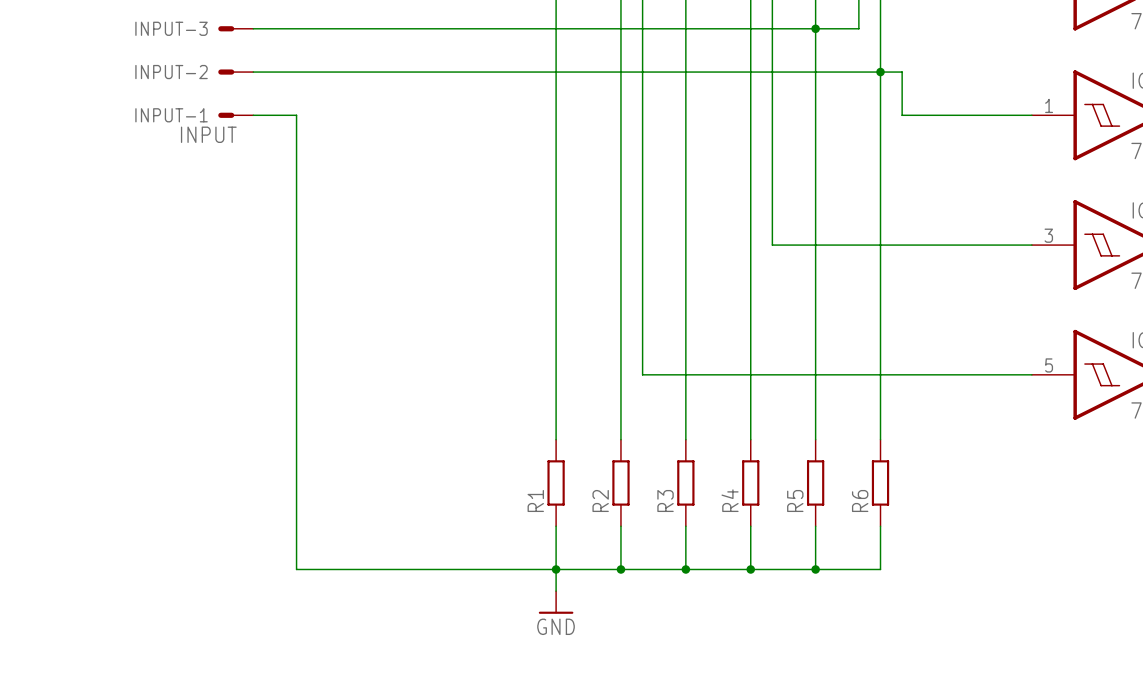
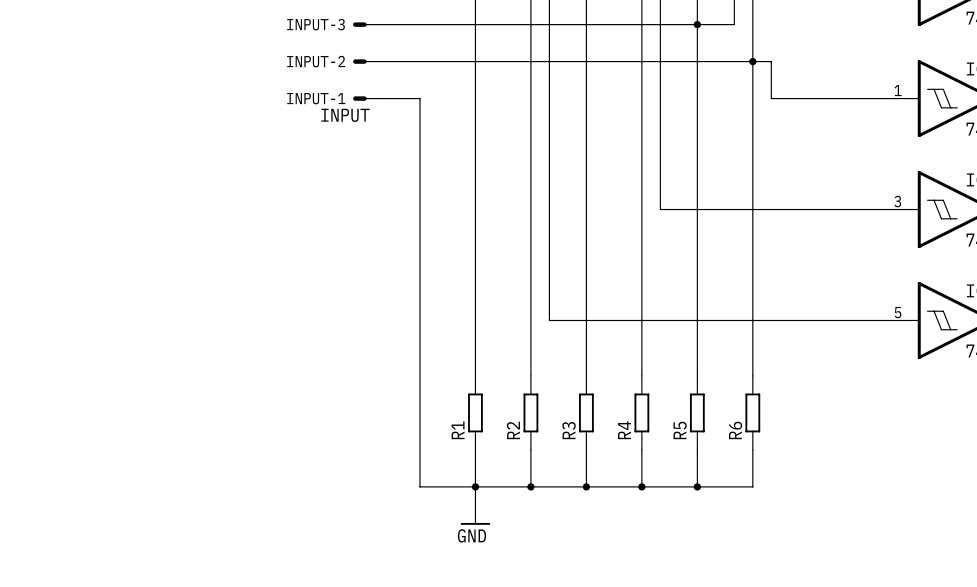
INPUT-3 position: (235, 28) -> (368, 24)
wire: (253, 28) (447, 28) -> none
INPUT-2 position: (235, 72) -> (368, 61)
wire: (253, 72) (447, 72) -> none
INPUT-1 position: (235, 115) -> (368, 98)
wire: (253, 115) (296, 115) (296, 569) (491, 569) -> (382, 98) (419, 98) (419, 486)

